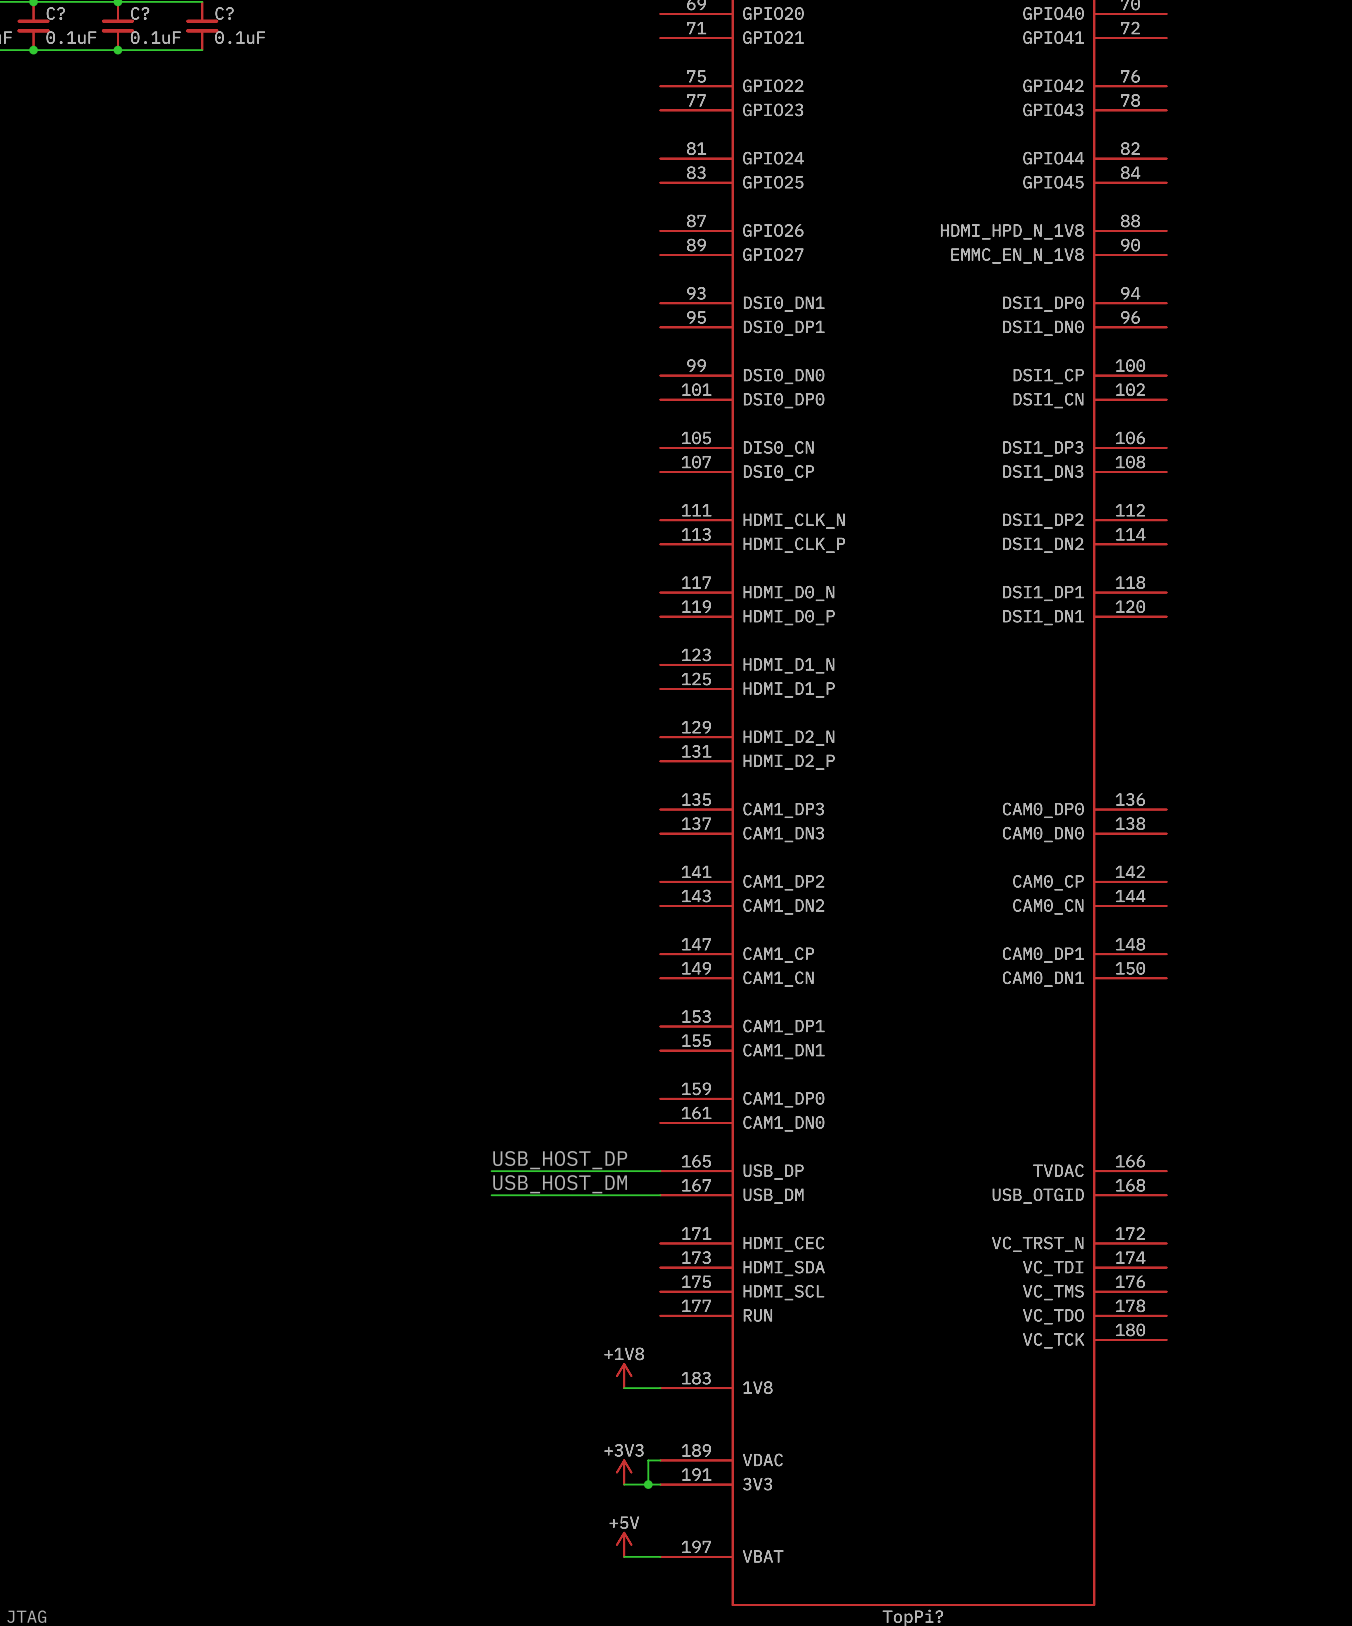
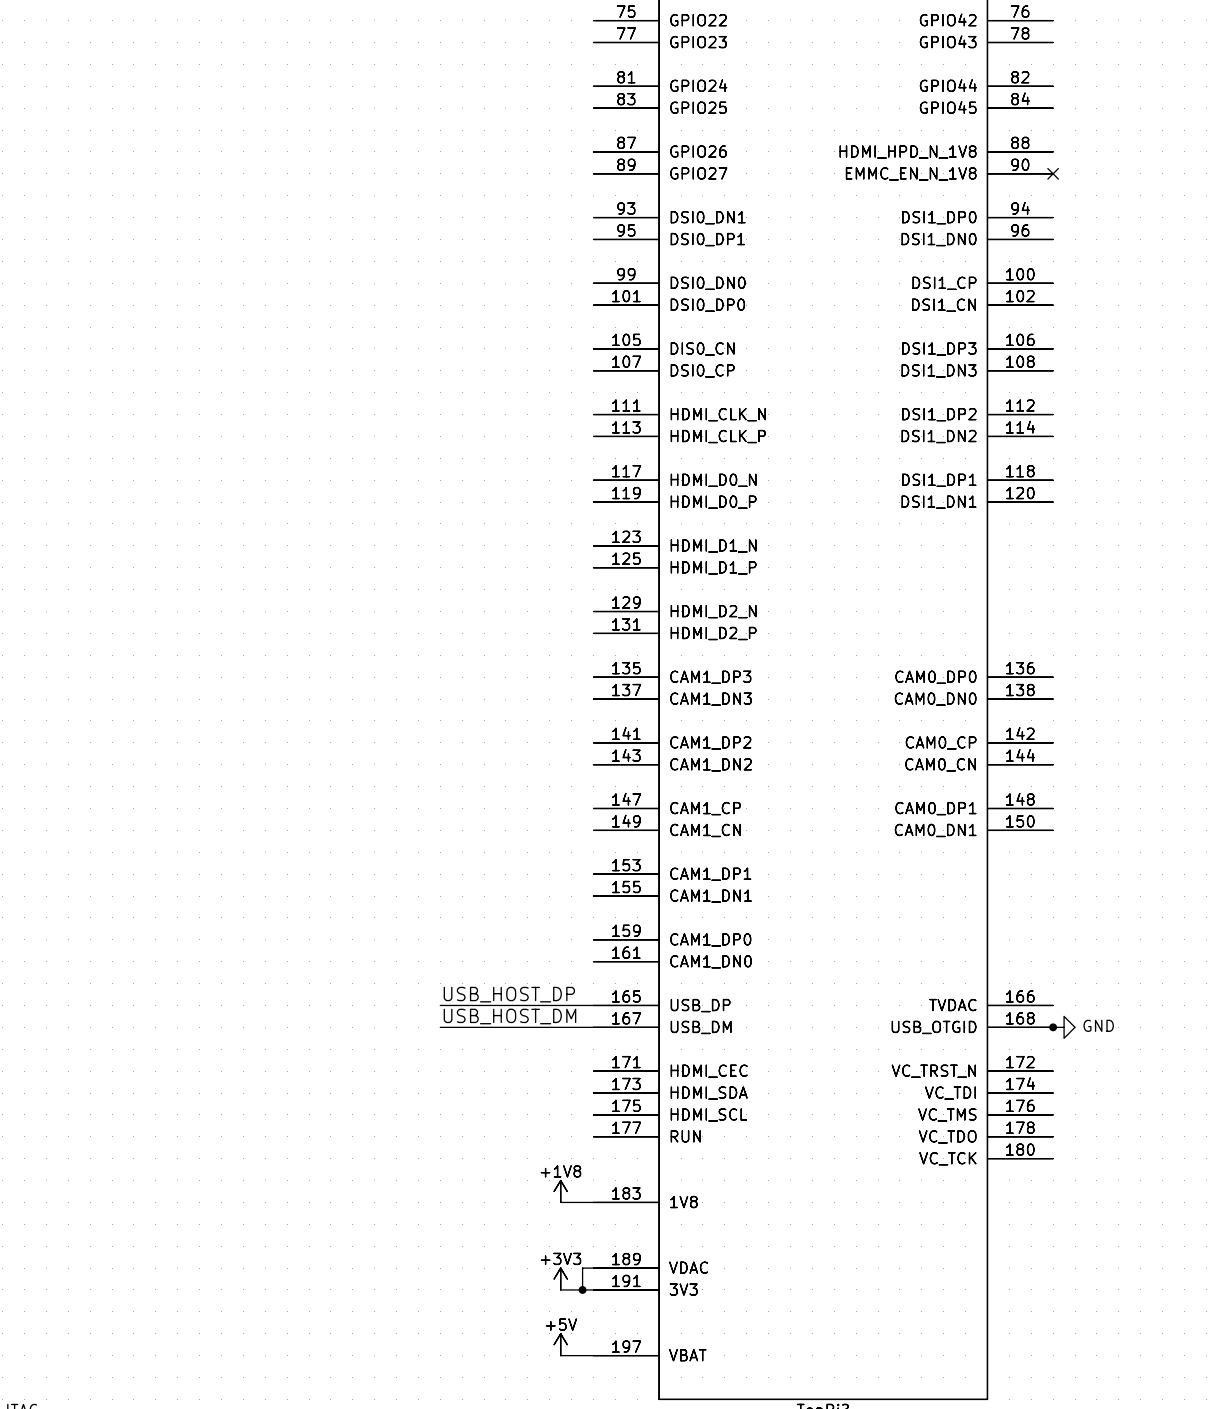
no-connect mark: none -> (1053, 173)
junction: none -> (1053, 1027)
power symbol: none -> GND (1064, 1027)

